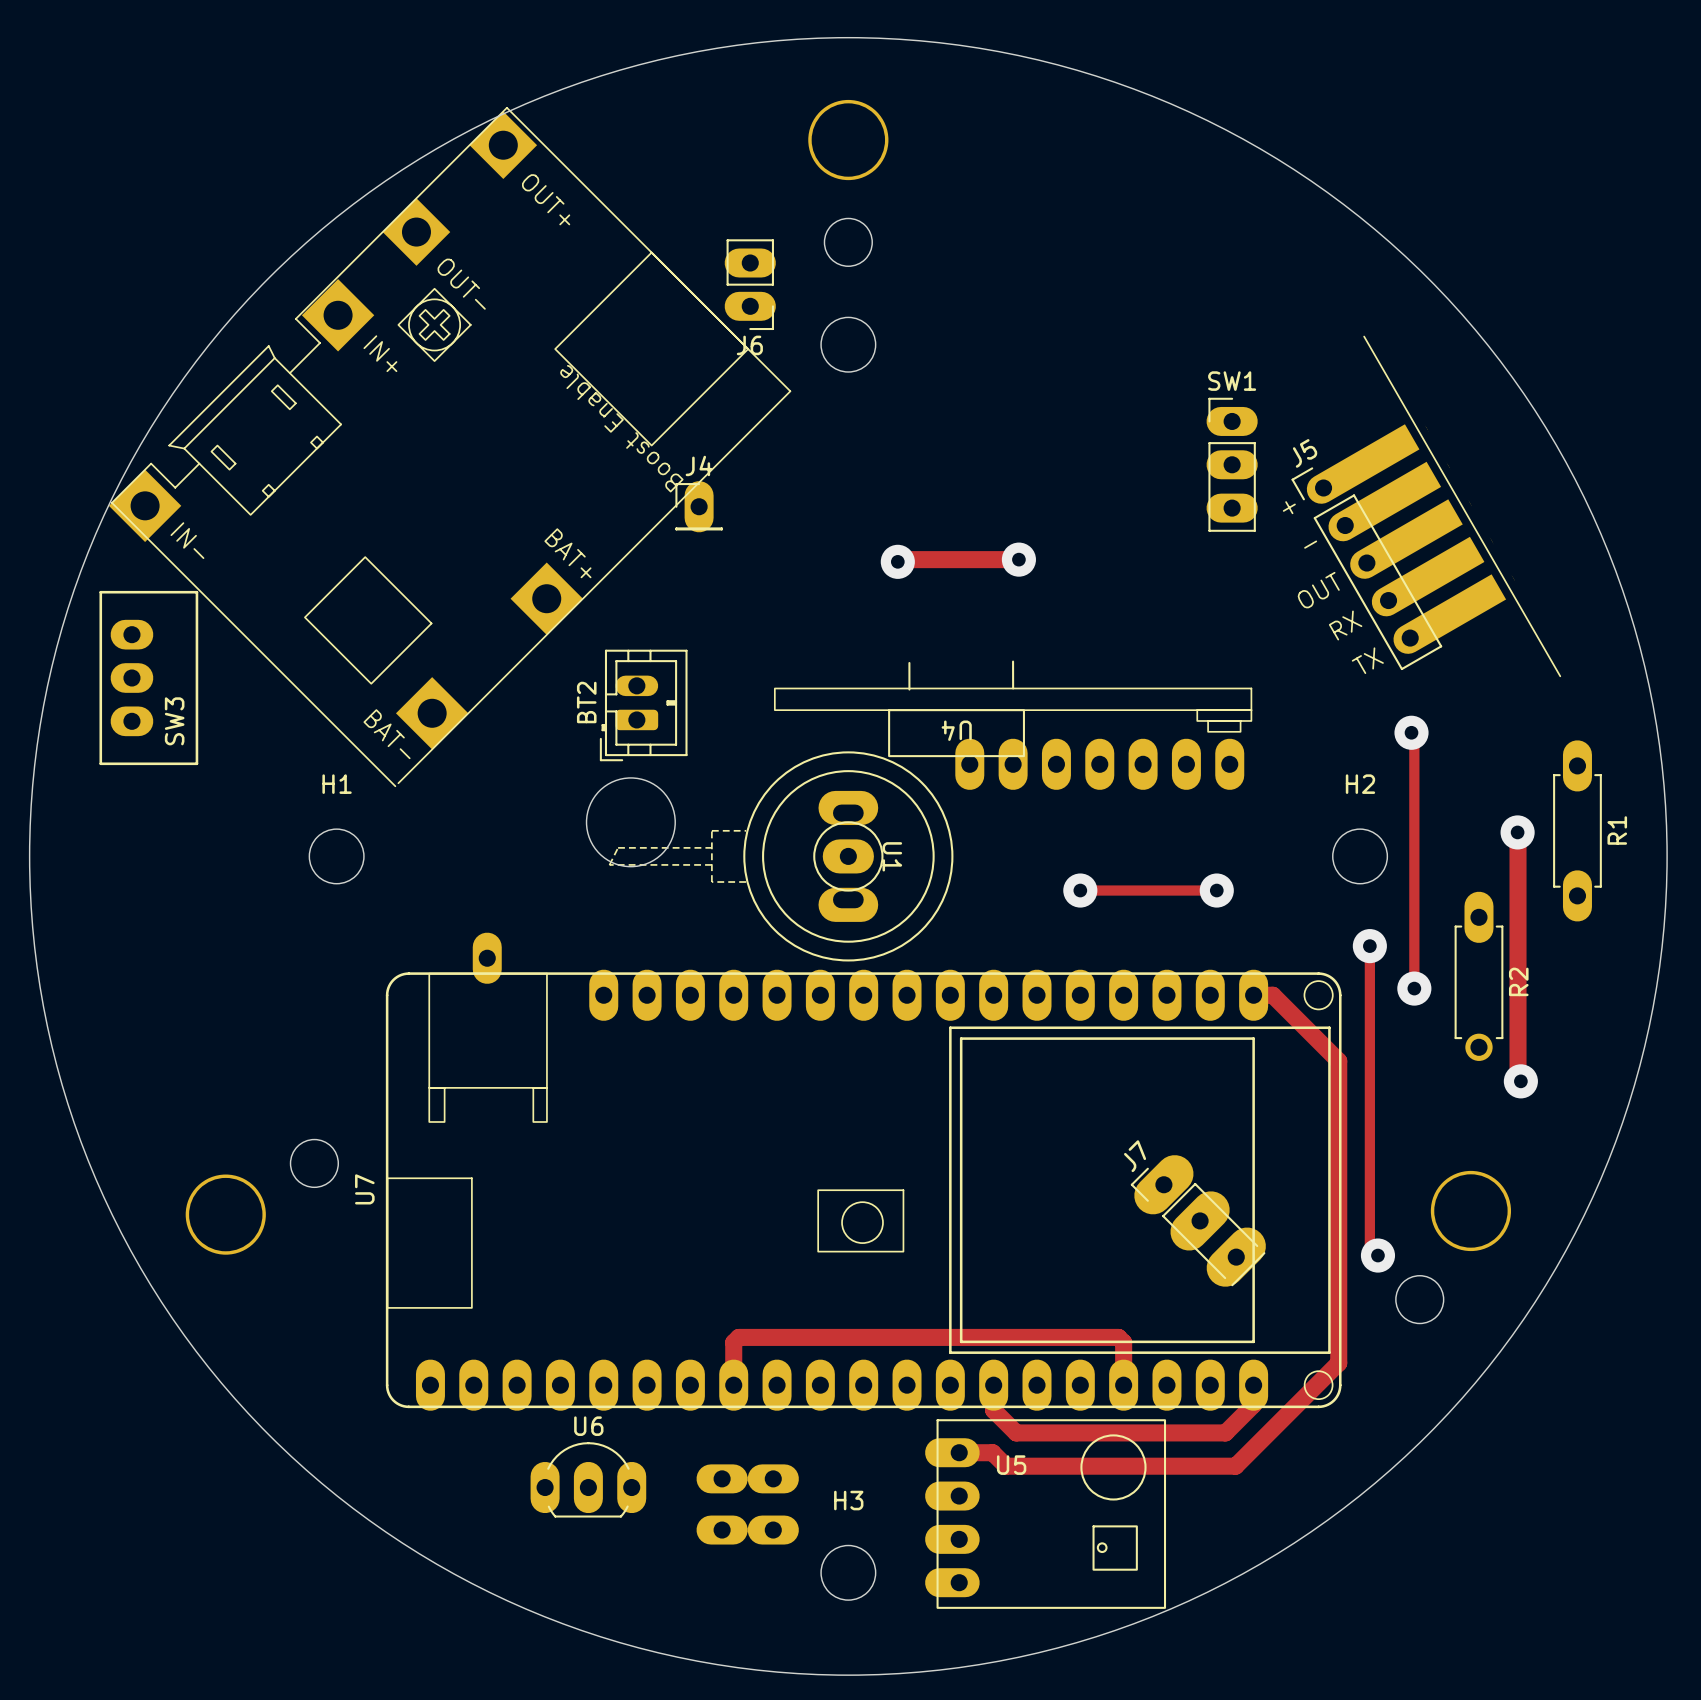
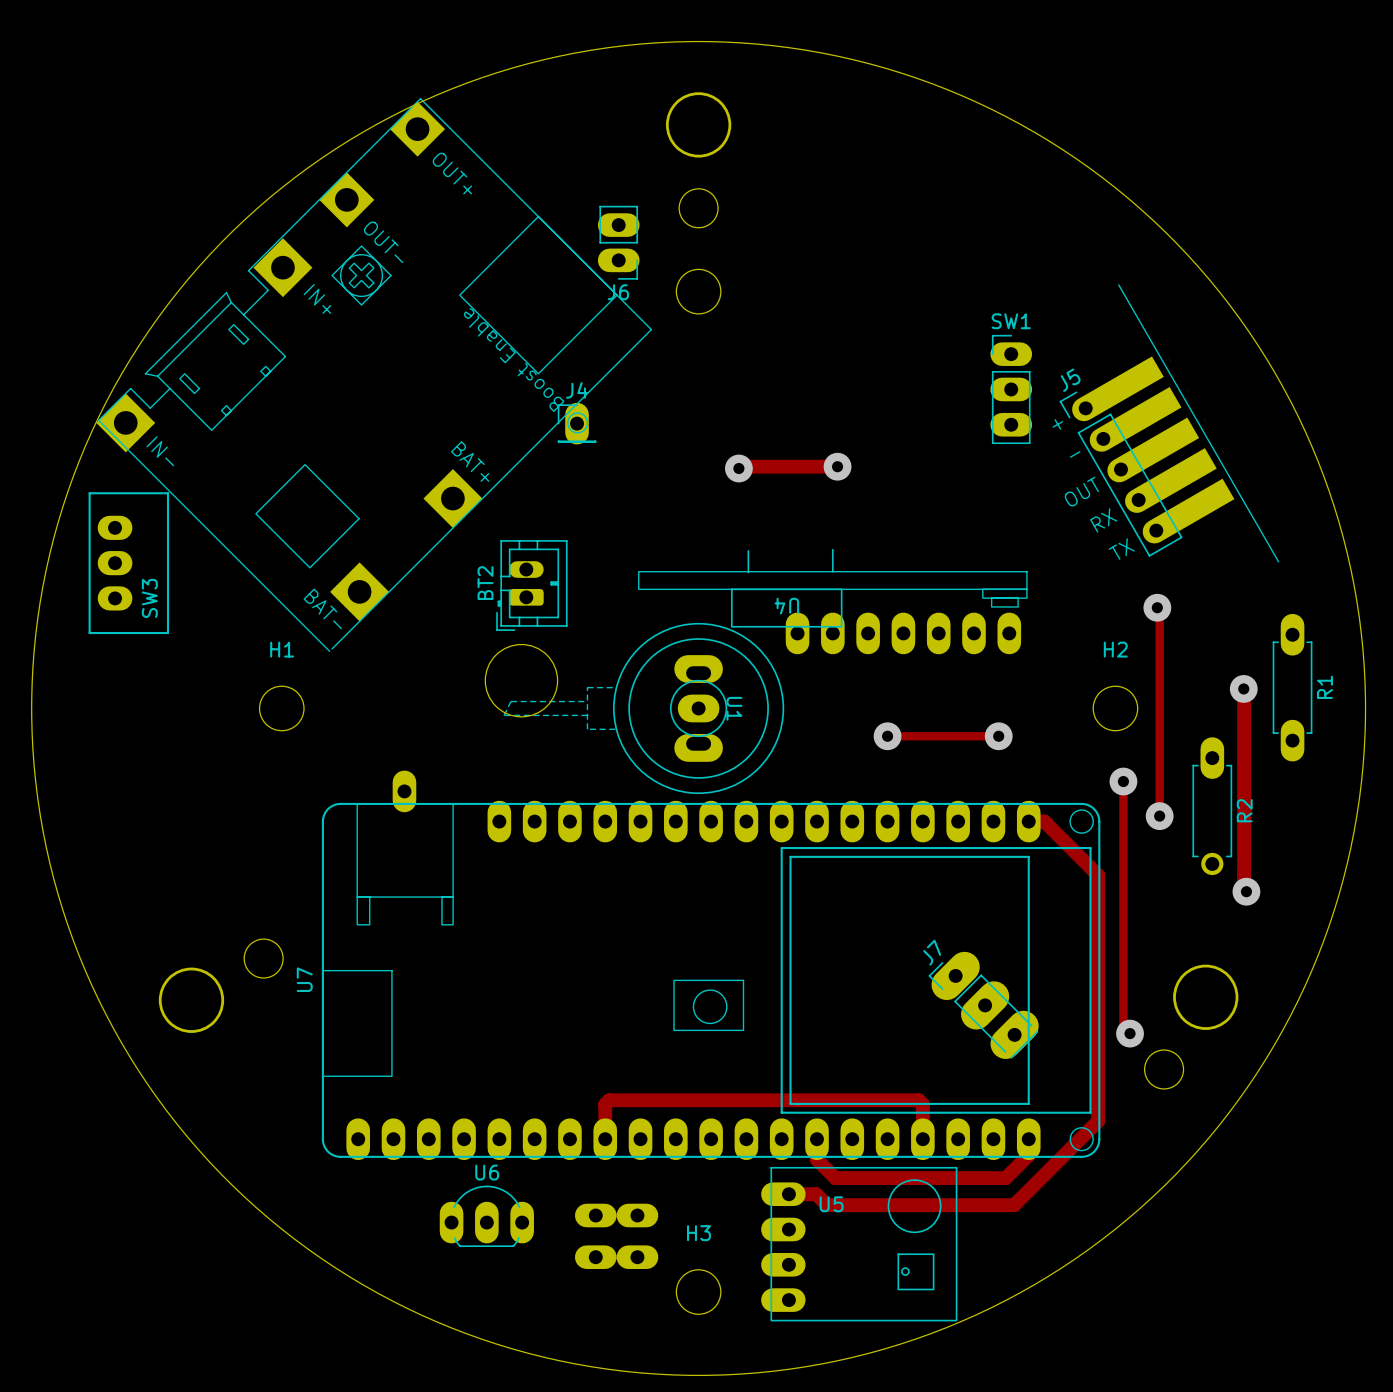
part footprint: [108, 106, 792, 788] -> [96, 97, 653, 653]

